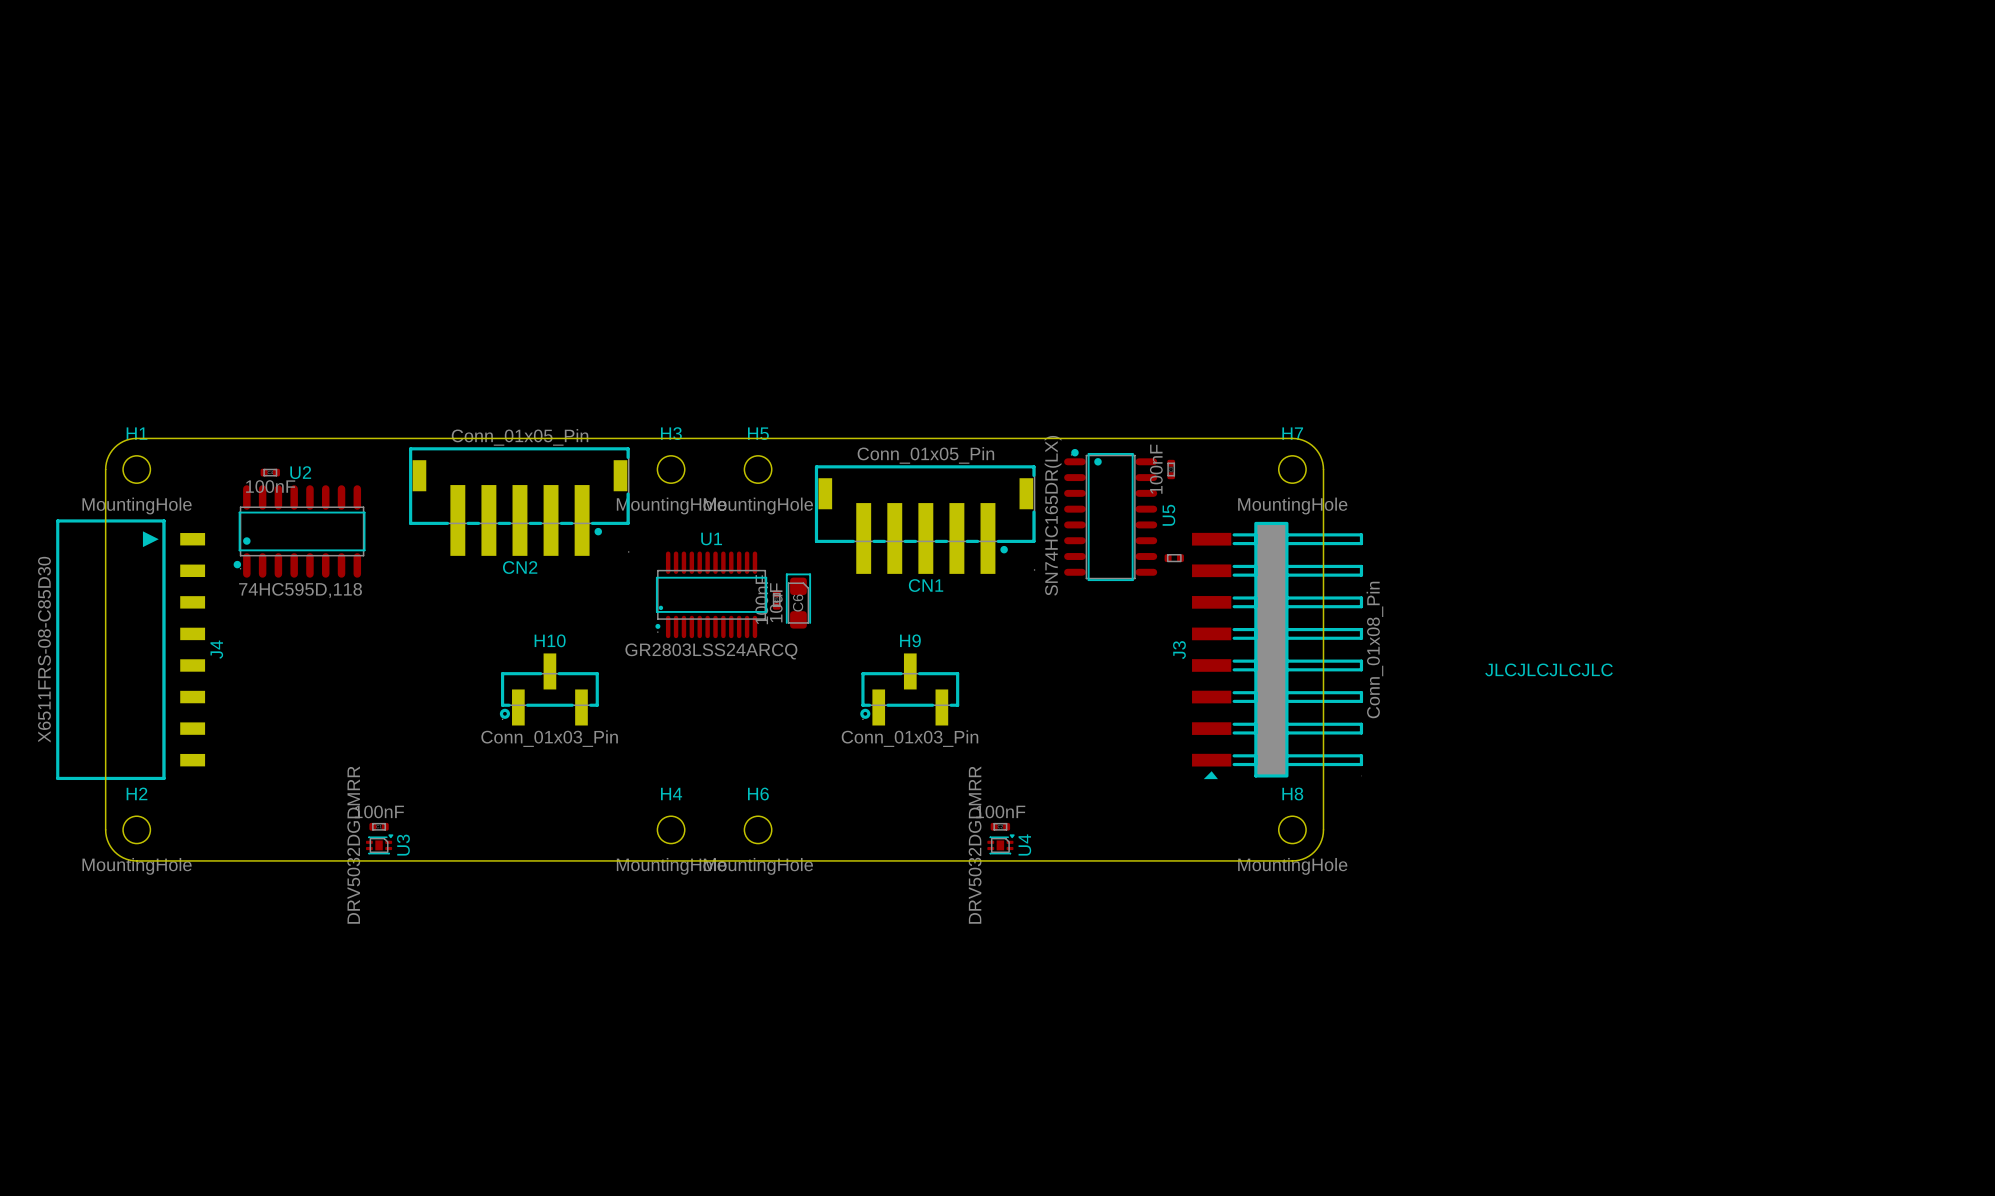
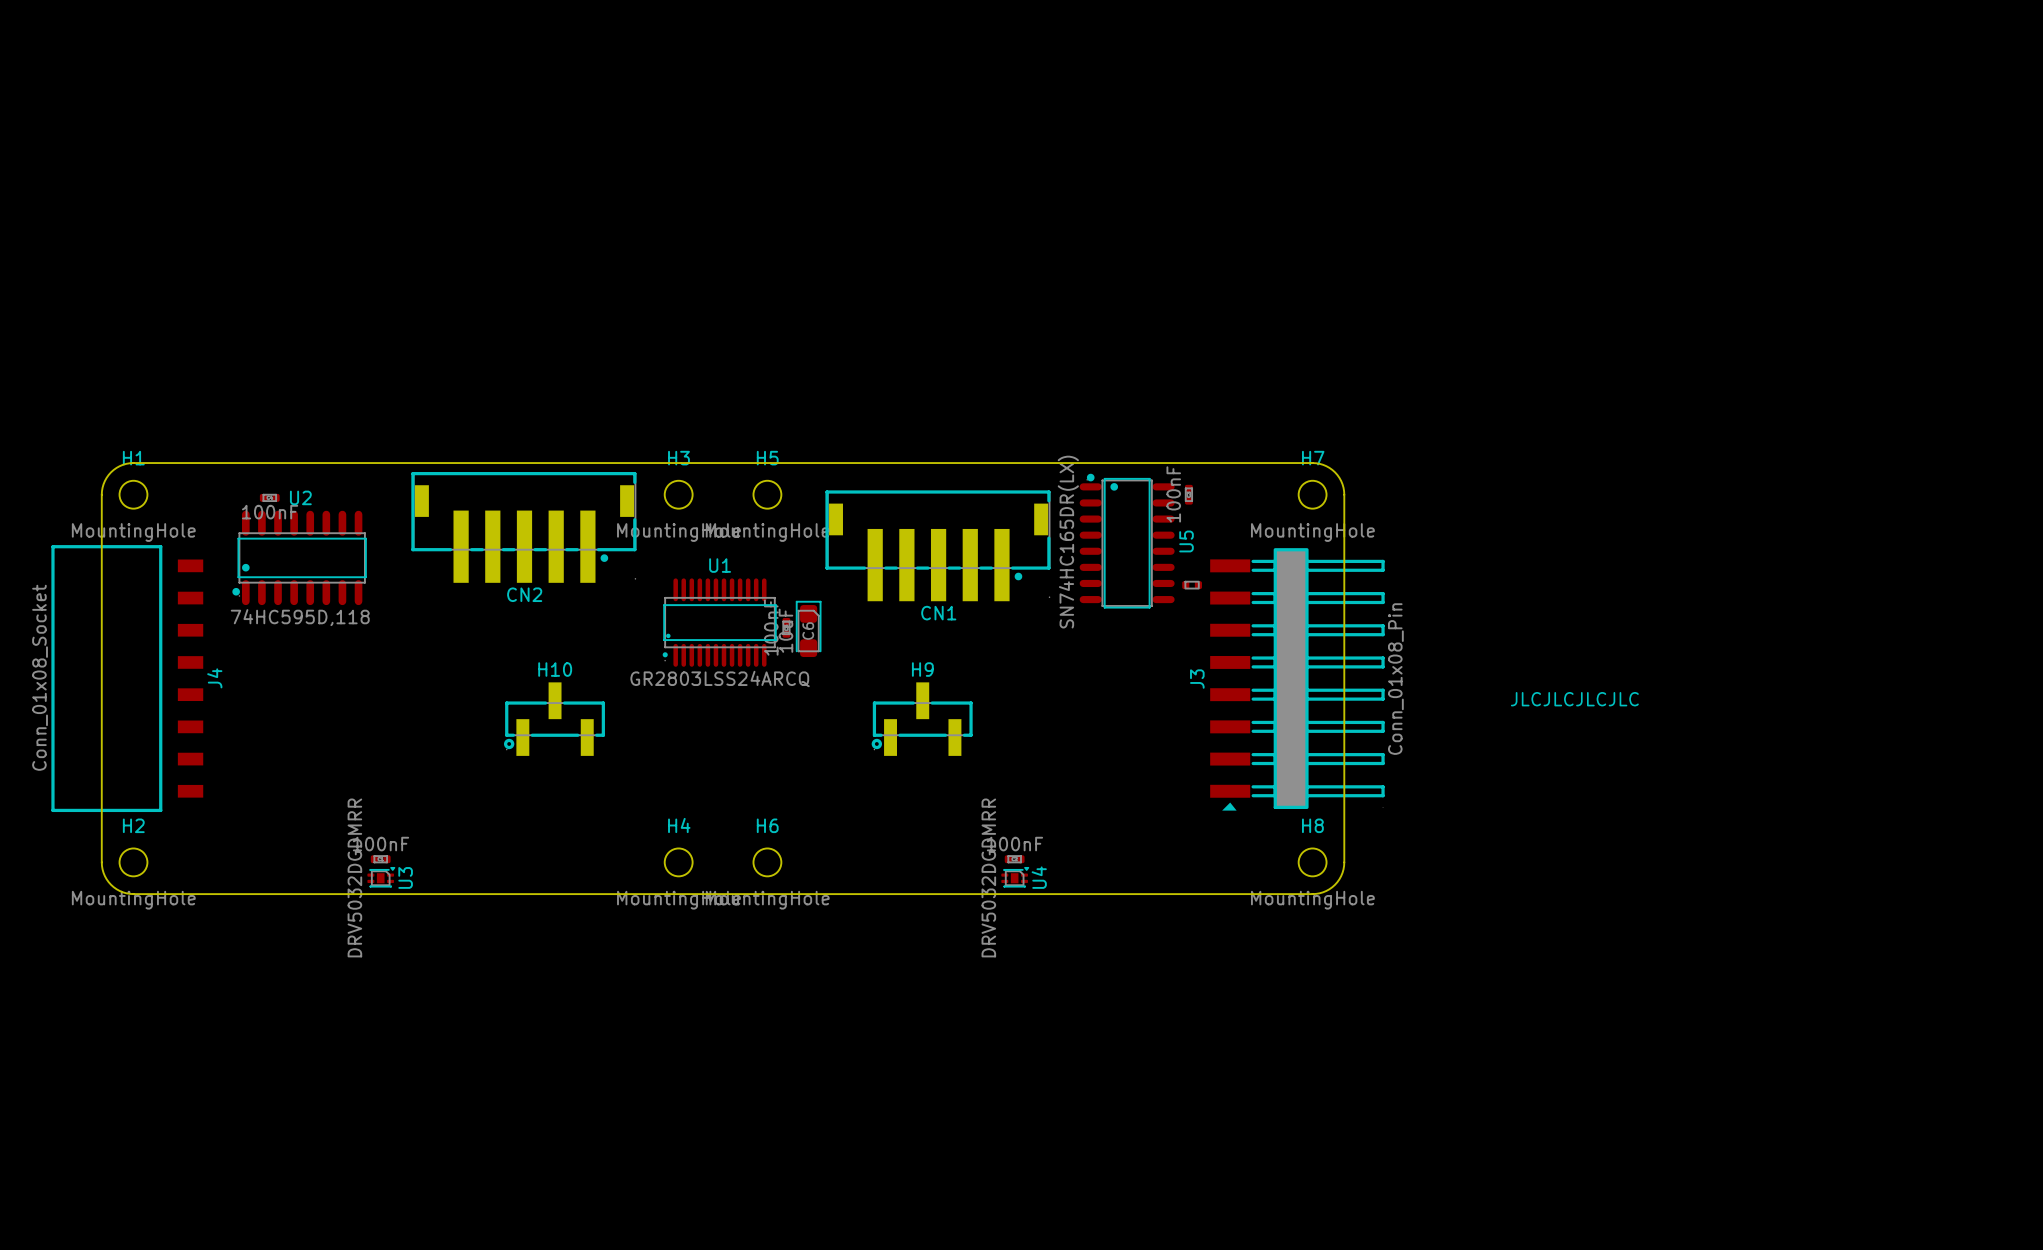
CN2 value: Conn_01x05_Pin (520, 437) -> none
CN1 value: Conn_01x05_Pin (925, 455) -> none
J4 footprint: [56, 519, 206, 781] -> [51, 545, 204, 813]
J4 value: X6511FRS-08-C85D30 (44, 649) -> Conn_01x08_Socket (40, 677)
H10 value: Conn_01x03_Pin (549, 738) -> none
H9 value: Conn_01x03_Pin (909, 738) -> none

